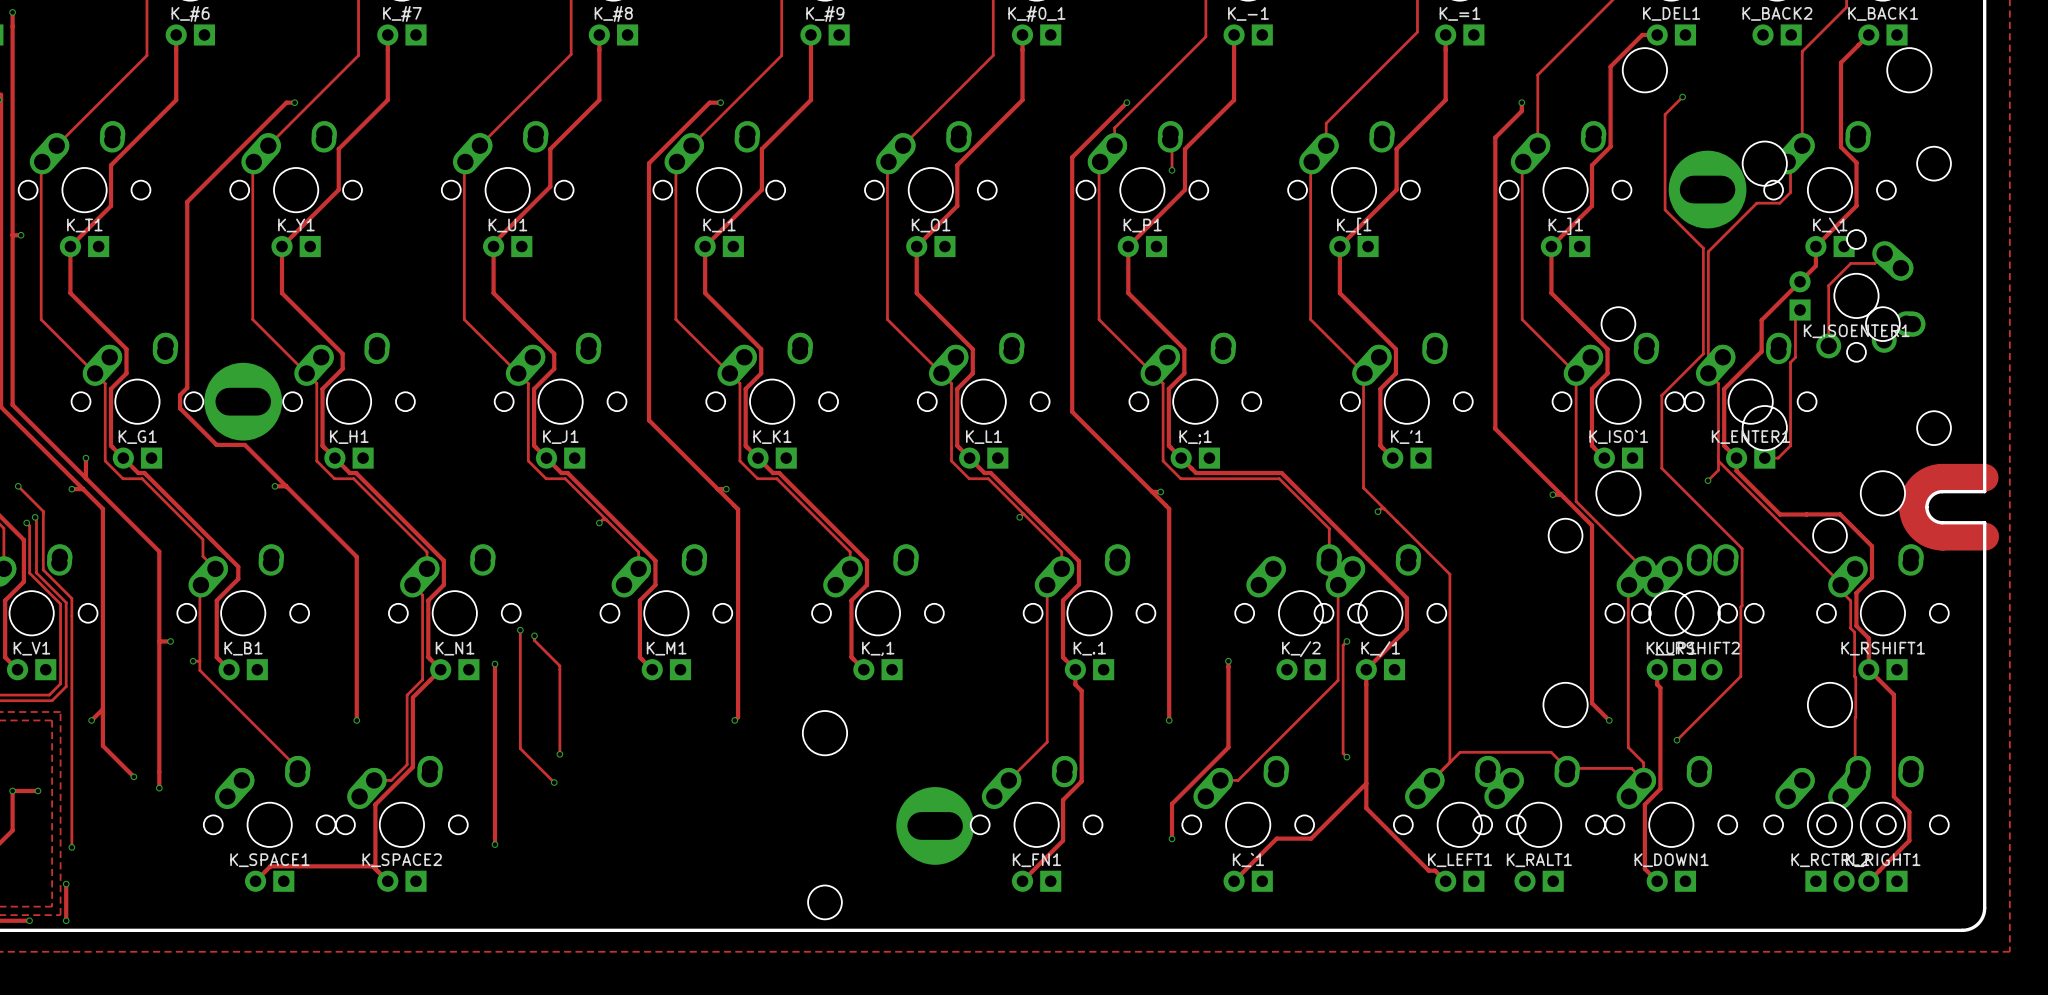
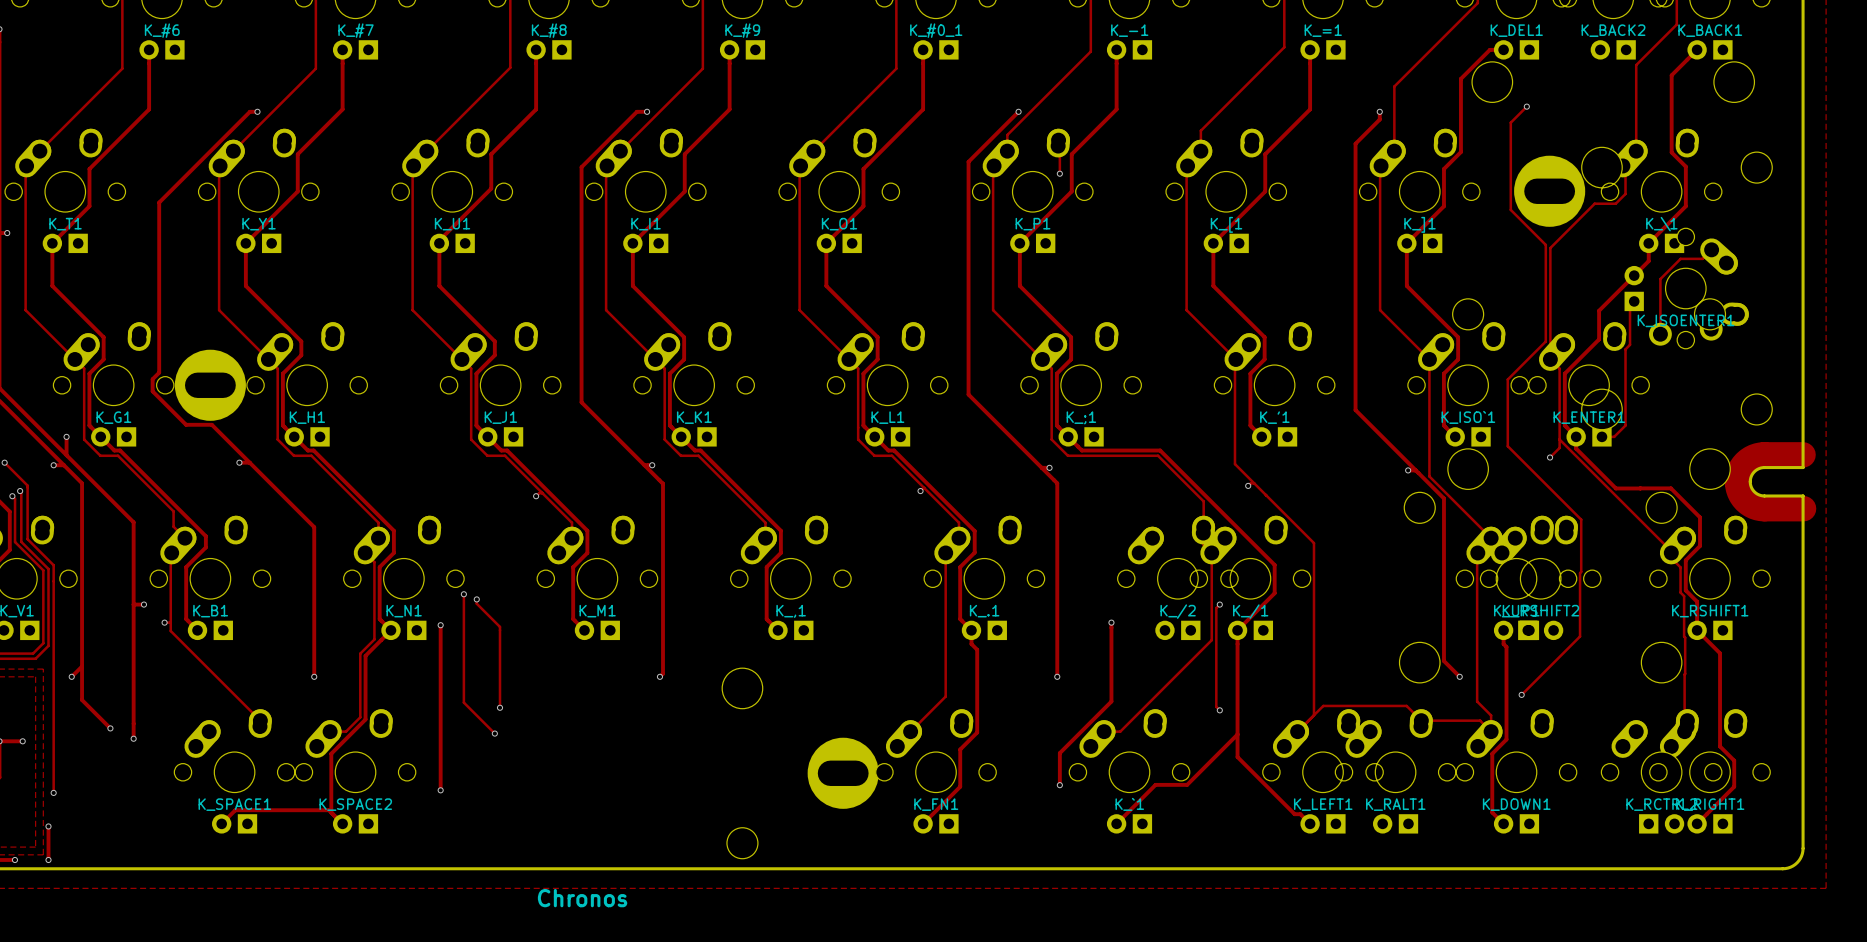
text: none -> Chronos (582, 898)

